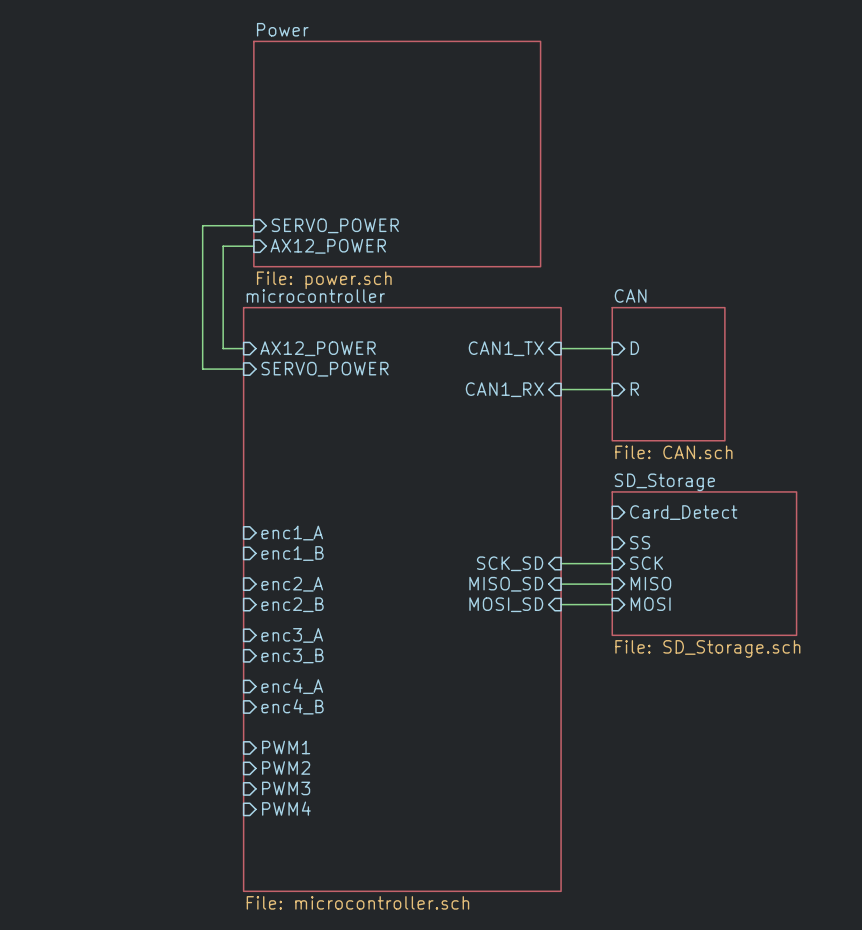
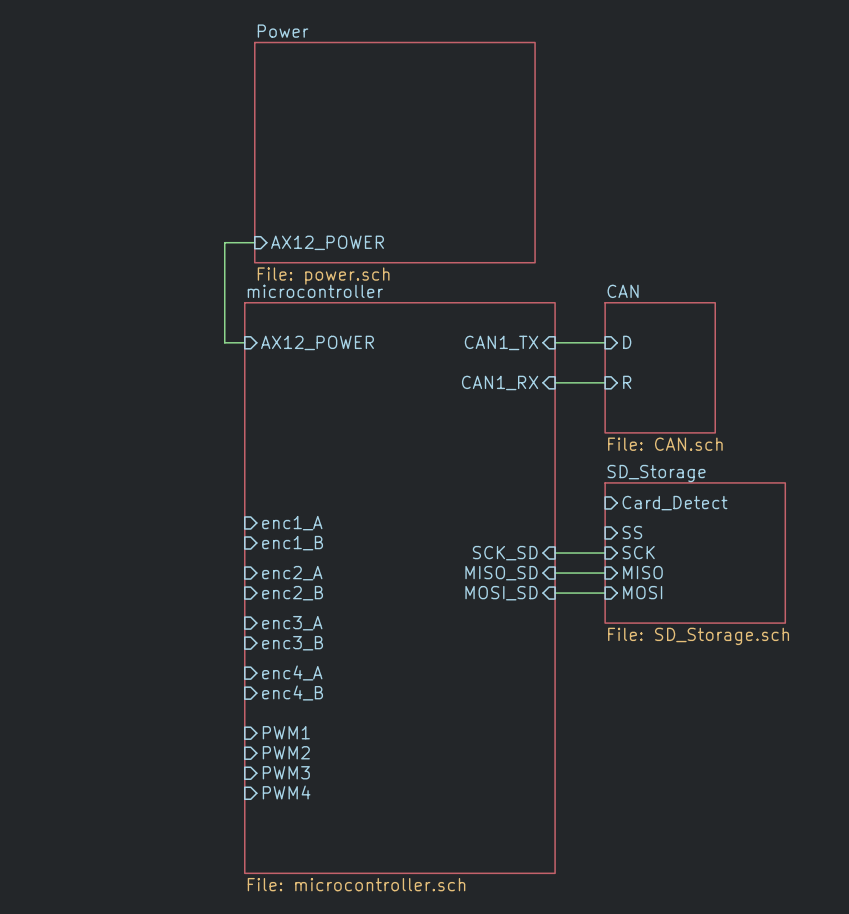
wire: (253, 225) (202, 225) (202, 369) (243, 369) -> none
sheet pin: SERVO_POWER (335, 225) -> none
sheet pin: SERVO_POWER (325, 369) -> none

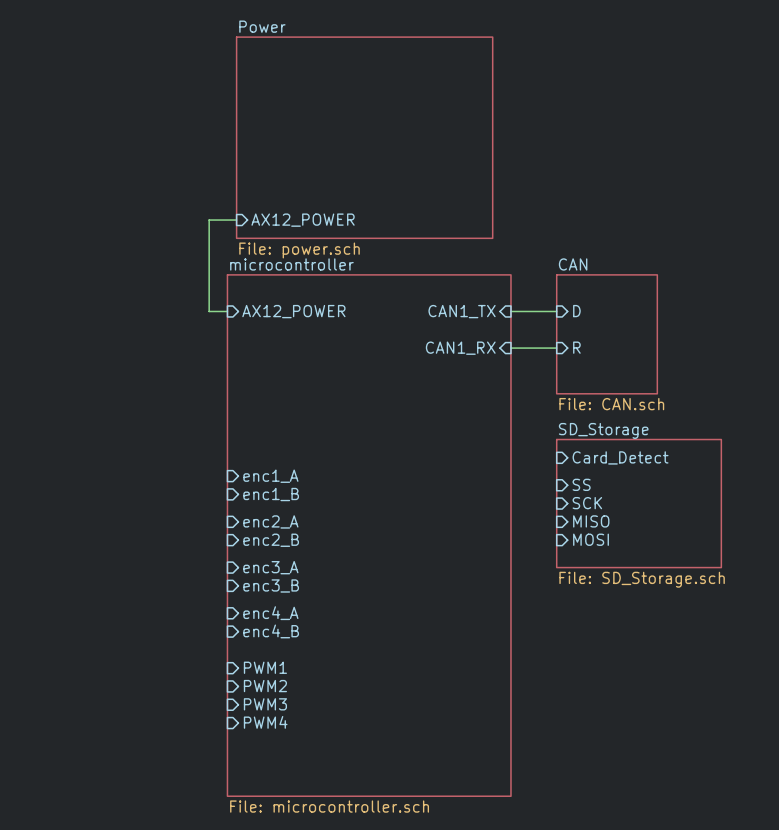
sheet pin: SCK_SD (505, 553) -> none
wire: (555, 553) (605, 553) -> none
sheet pin: MISO_SD (501, 573) -> none
wire: (555, 573) (605, 573) -> none
sheet pin: MOSI_SD (501, 593) -> none
wire: (555, 593) (605, 593) -> none

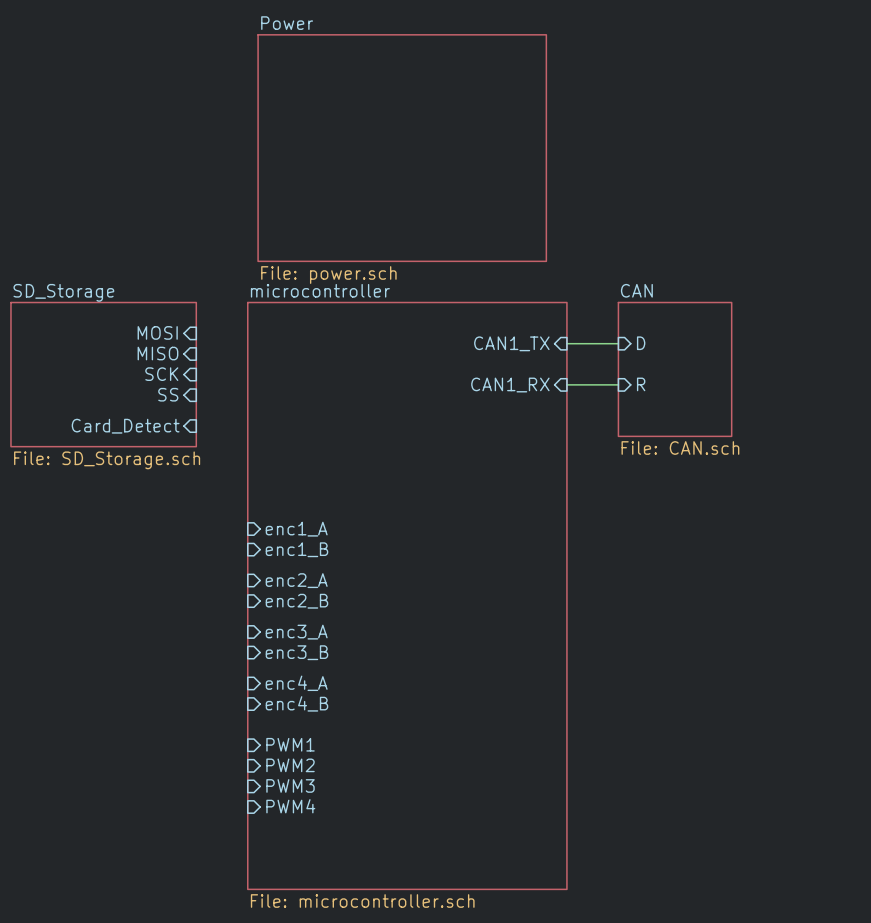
wire: (236, 220) (209, 220) (209, 311) (227, 311) -> none
sheet pin: AX12_POWER (303, 220) -> none
sheet pin: none -> MOSI (157, 332)
sheet pin: AX12_POWER (293, 311) -> none
sheet pin: none -> MISO (157, 353)
sheet SD_Storage: none -> File: SD_Storage.sch (103, 374)
sheet pin: none -> SCK (161, 374)
sheet pin: none -> SS (168, 394)
sheet pin: none -> Card_Detect (125, 426)
sheet pin: Card_Detect (620, 457) -> none
sheet pin: SS (581, 484) -> none
sheet pin: SCK (587, 503) -> none
sheet SD_Storage: File: SD_Storage.sch (639, 503) -> none
sheet pin: MISO (591, 521) -> none
sheet pin: MOSI (591, 539) -> none

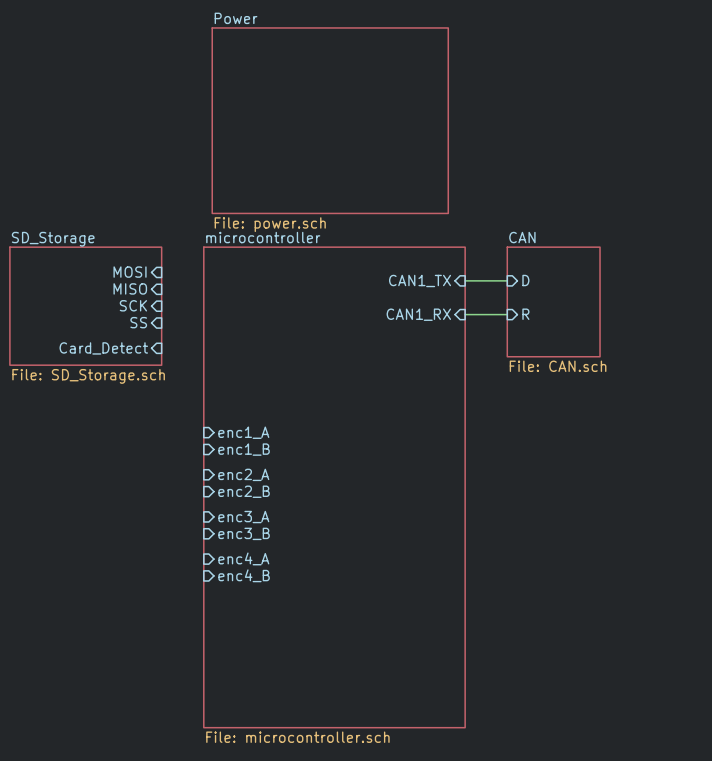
sheet pin: PWM1 (290, 744) -> none
sheet pin: PWM2 (290, 765) -> none
sheet pin: PWM3 (290, 785) -> none
sheet pin: PWM4 (290, 806) -> none

